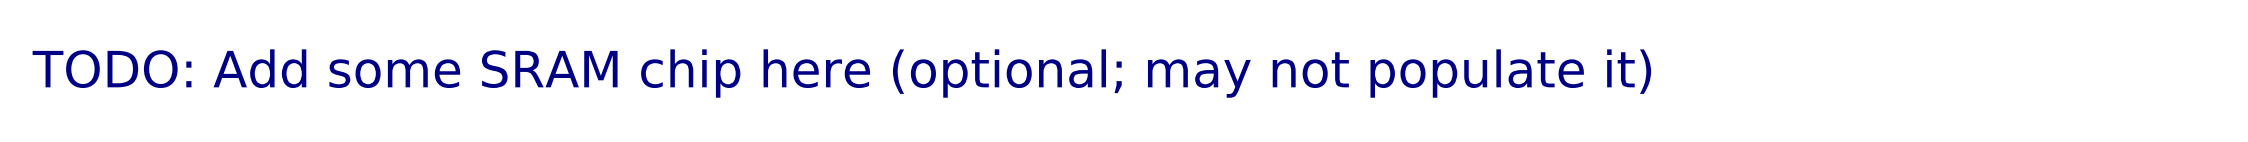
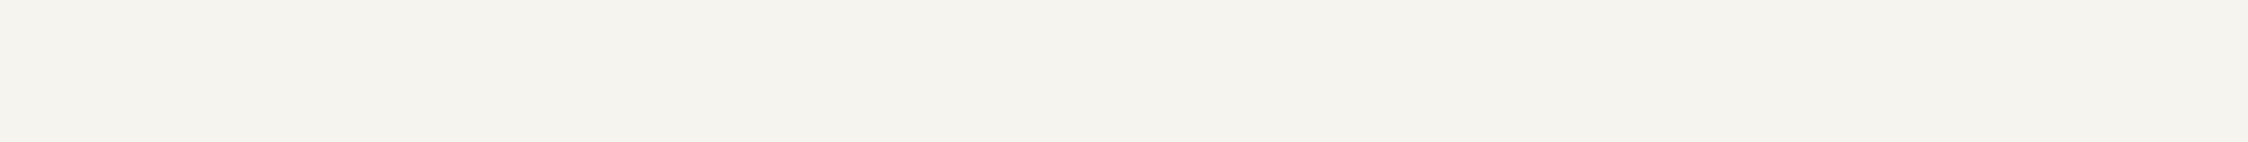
text: TODO: Add some SRAM chip here (optional; may not populate it) (841, 73) -> none

